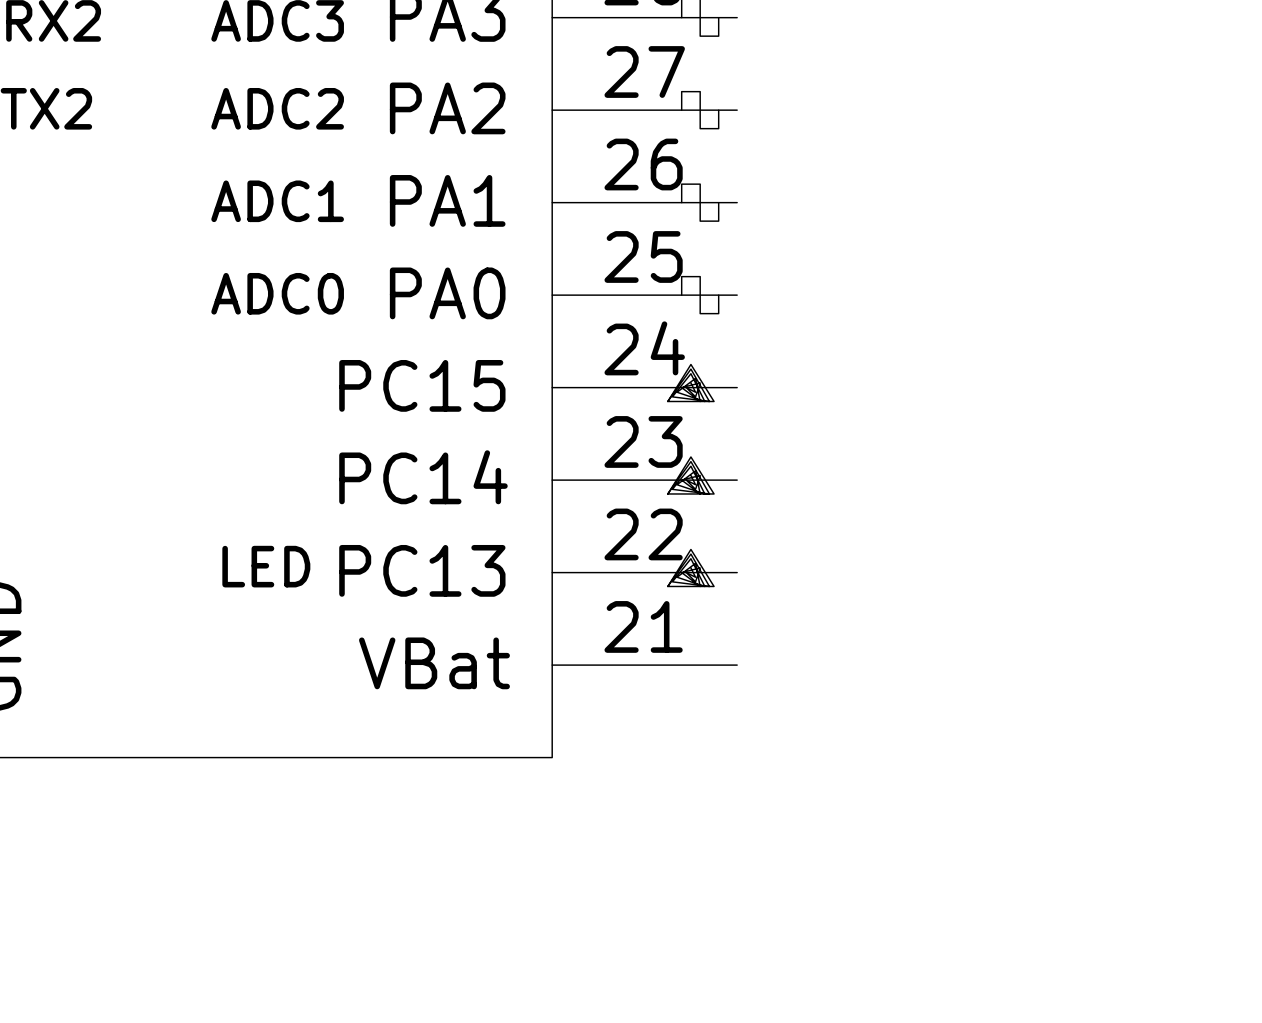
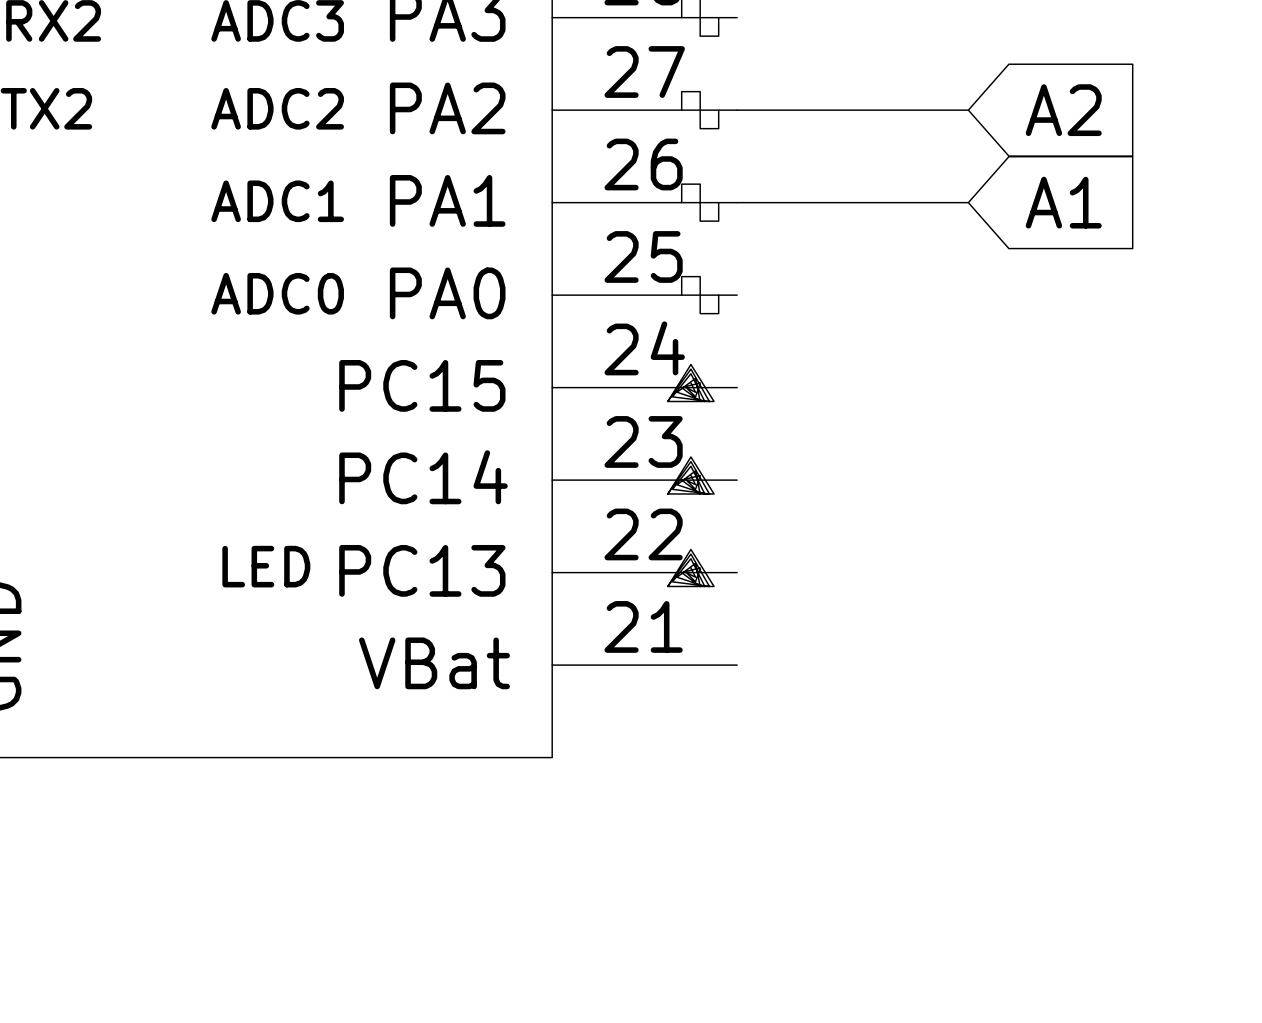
wire: none -> (737, 110) (968, 110)
global label: none -> A2 (1063, 110)
wire: none -> (737, 202) (968, 202)
global label: none -> A1 (1063, 202)

